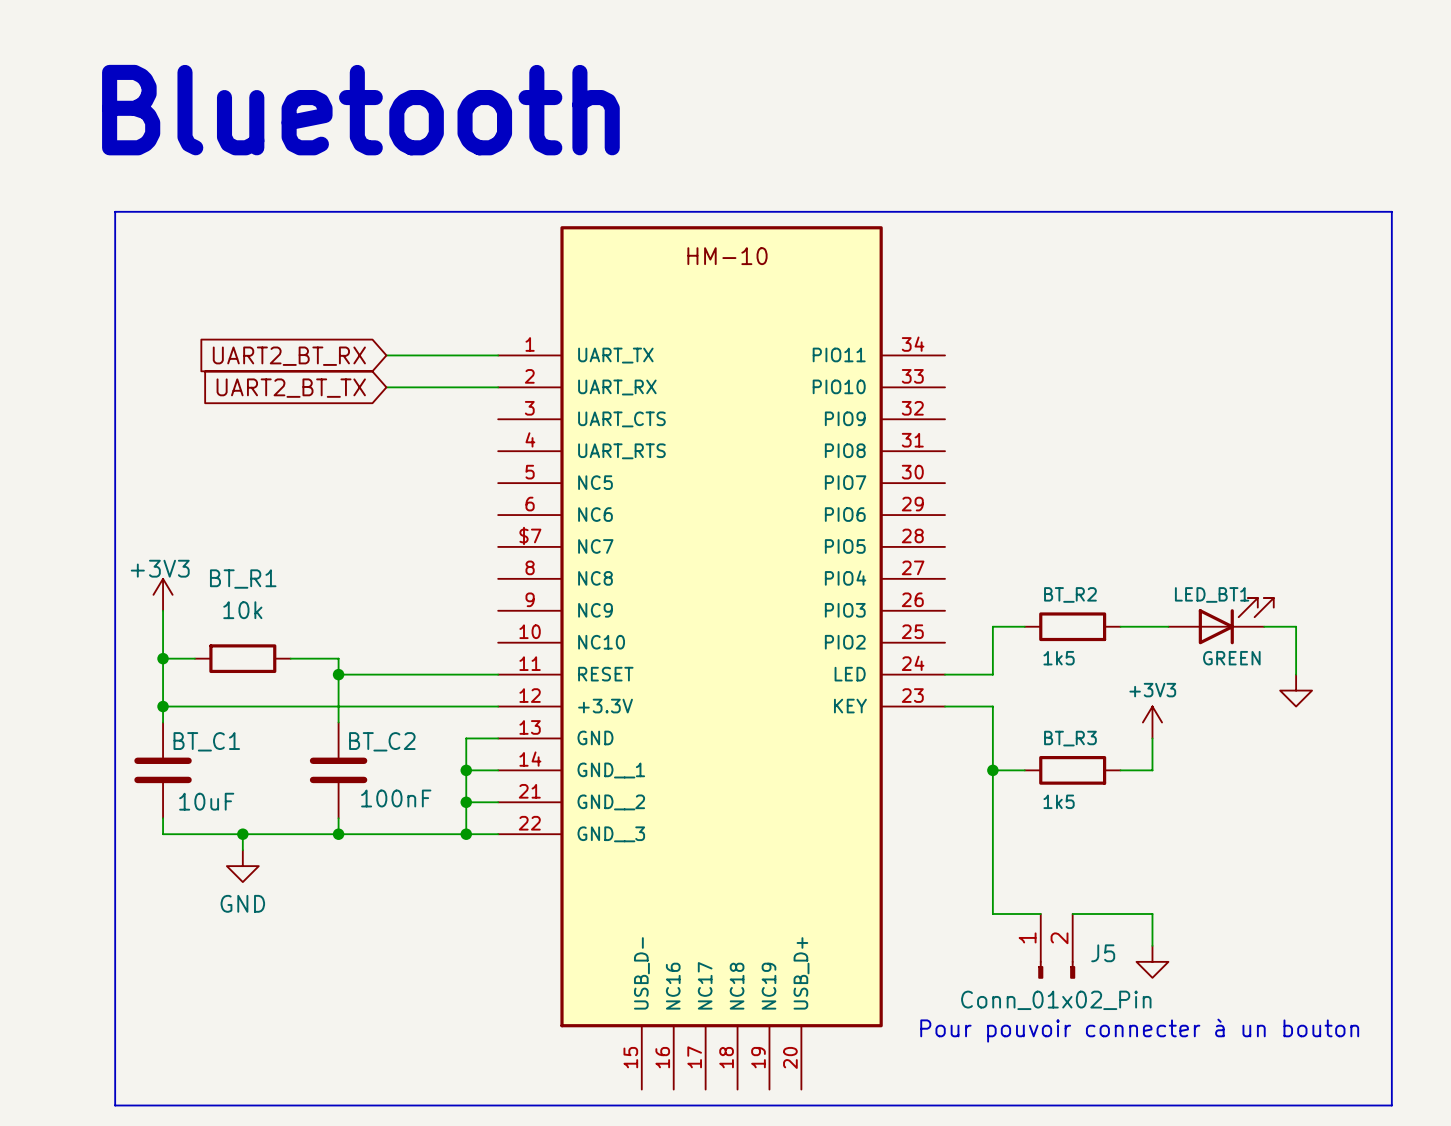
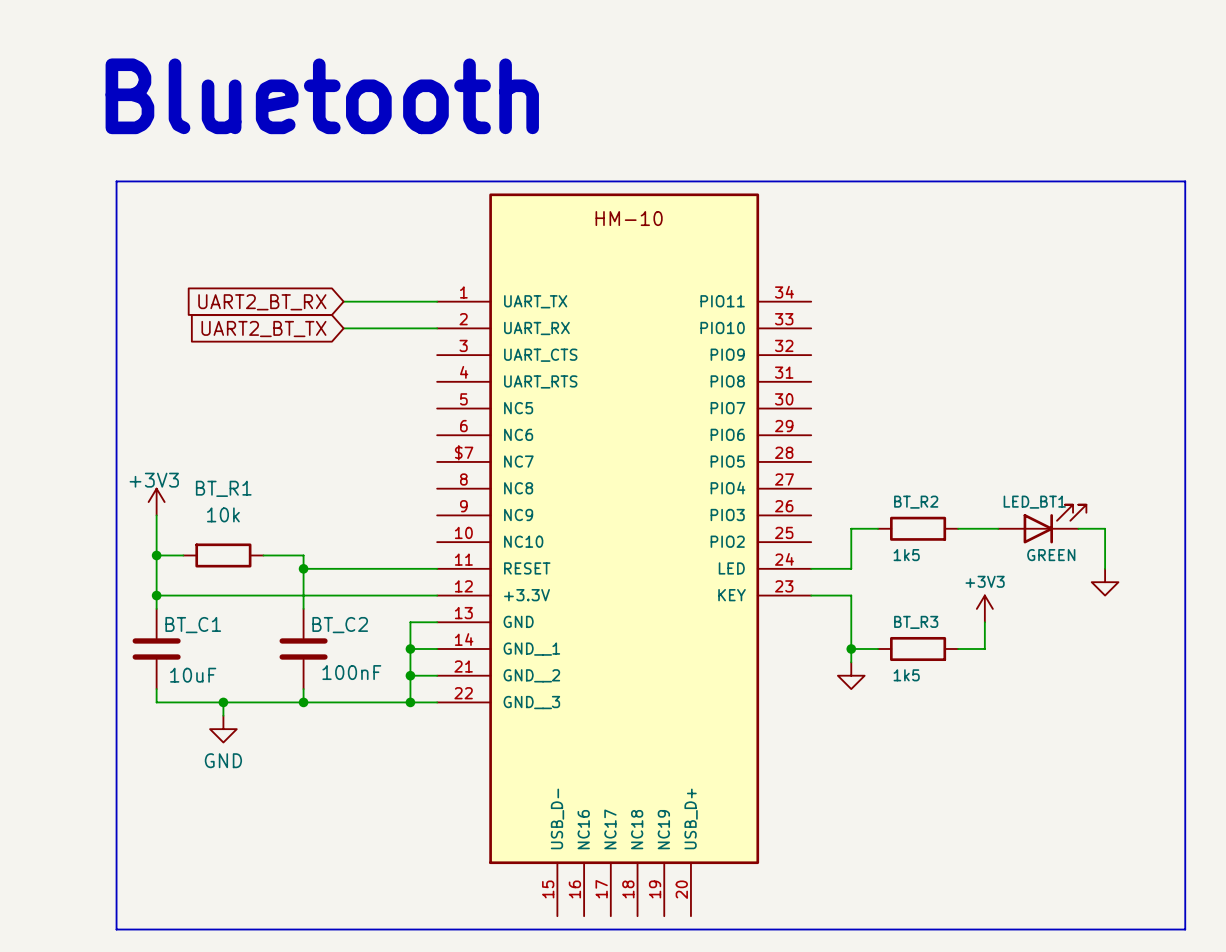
wire: (992, 786) (992, 913) (1040, 913) -> none
wire: (1072, 913) (1152, 913) (1152, 945) -> none
J5: Conn_01x02_Pin (1056, 946) -> none
power symbol position: (1152, 961) -> (851, 675)
text: Pour pouvoir connecter à un bouton (1139, 1030) -> none

